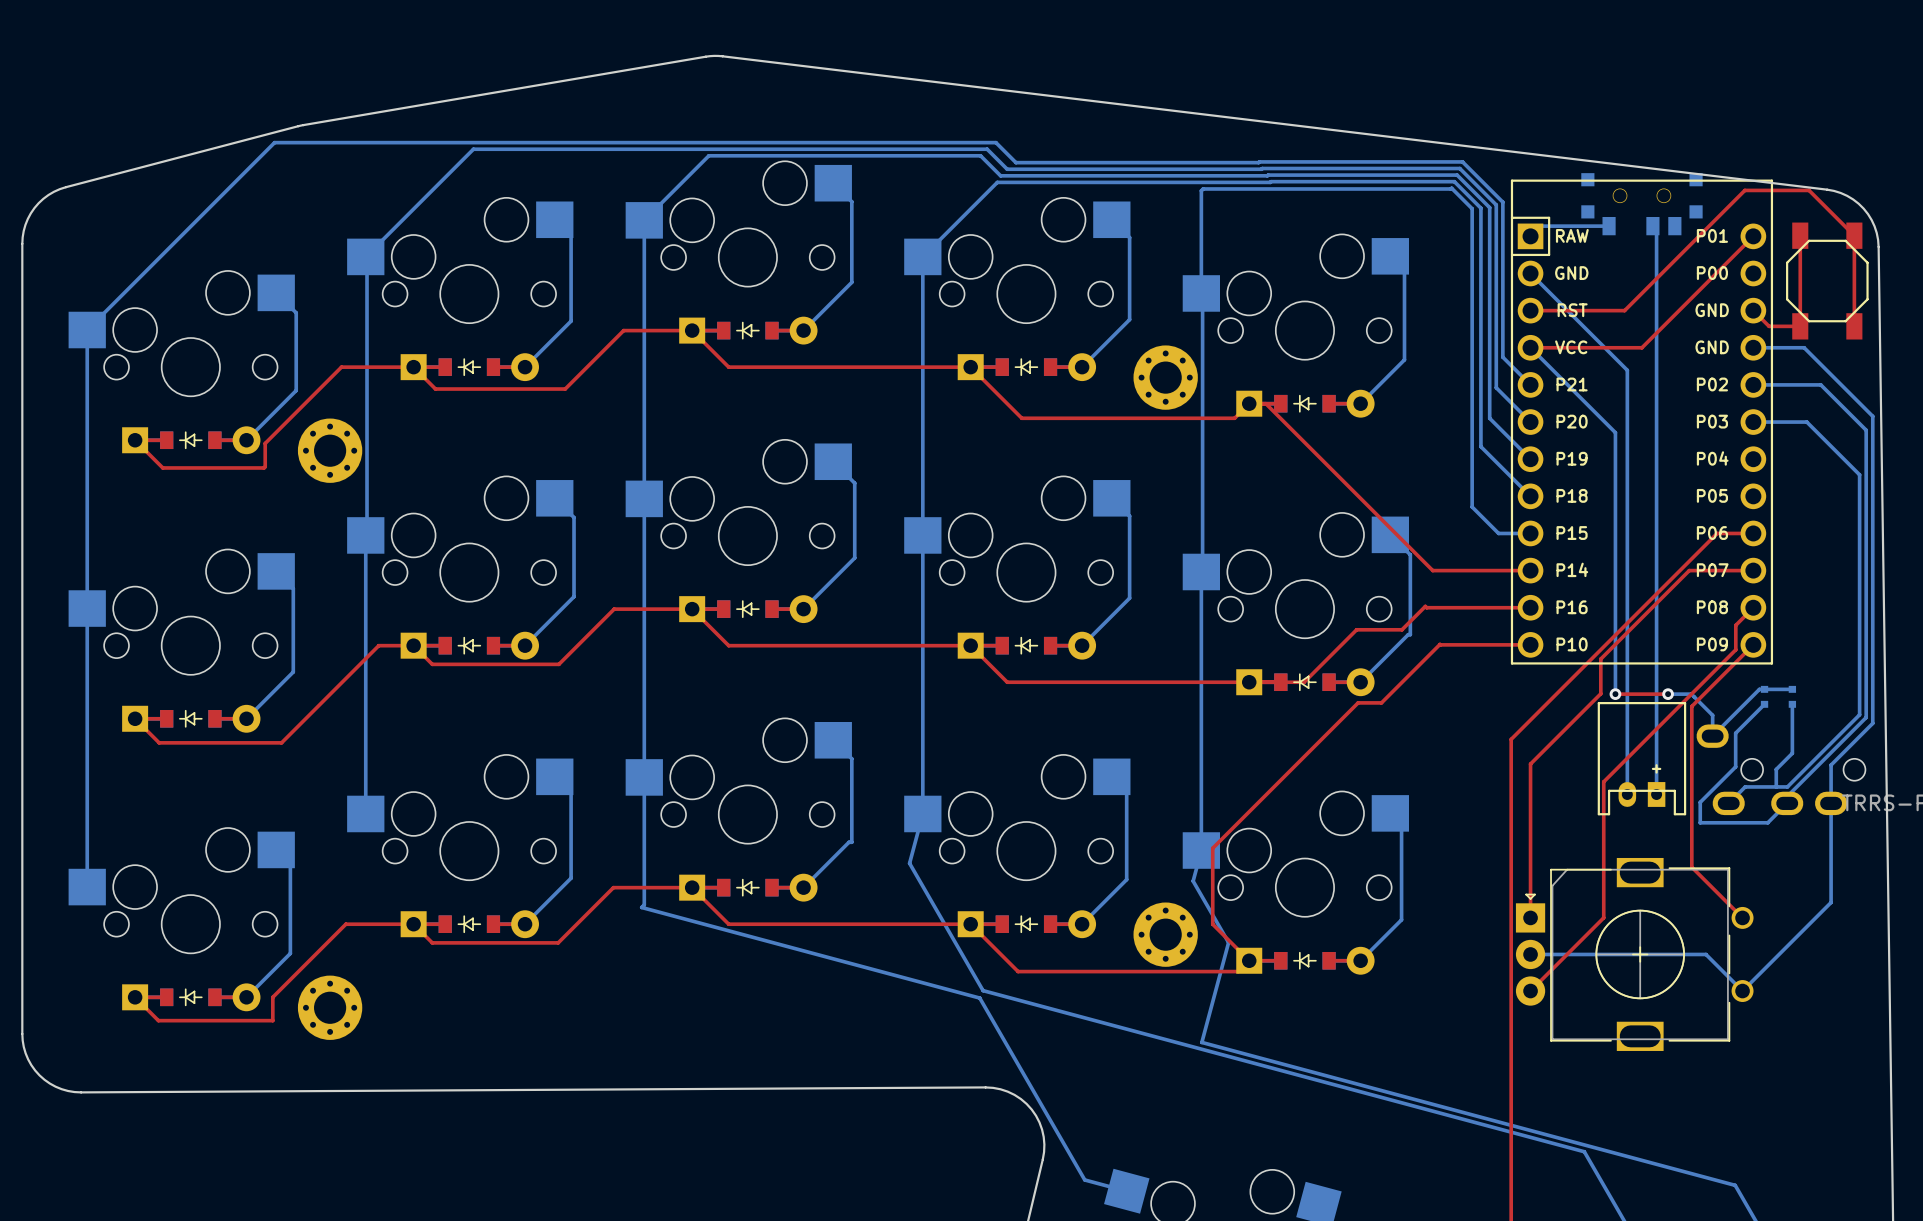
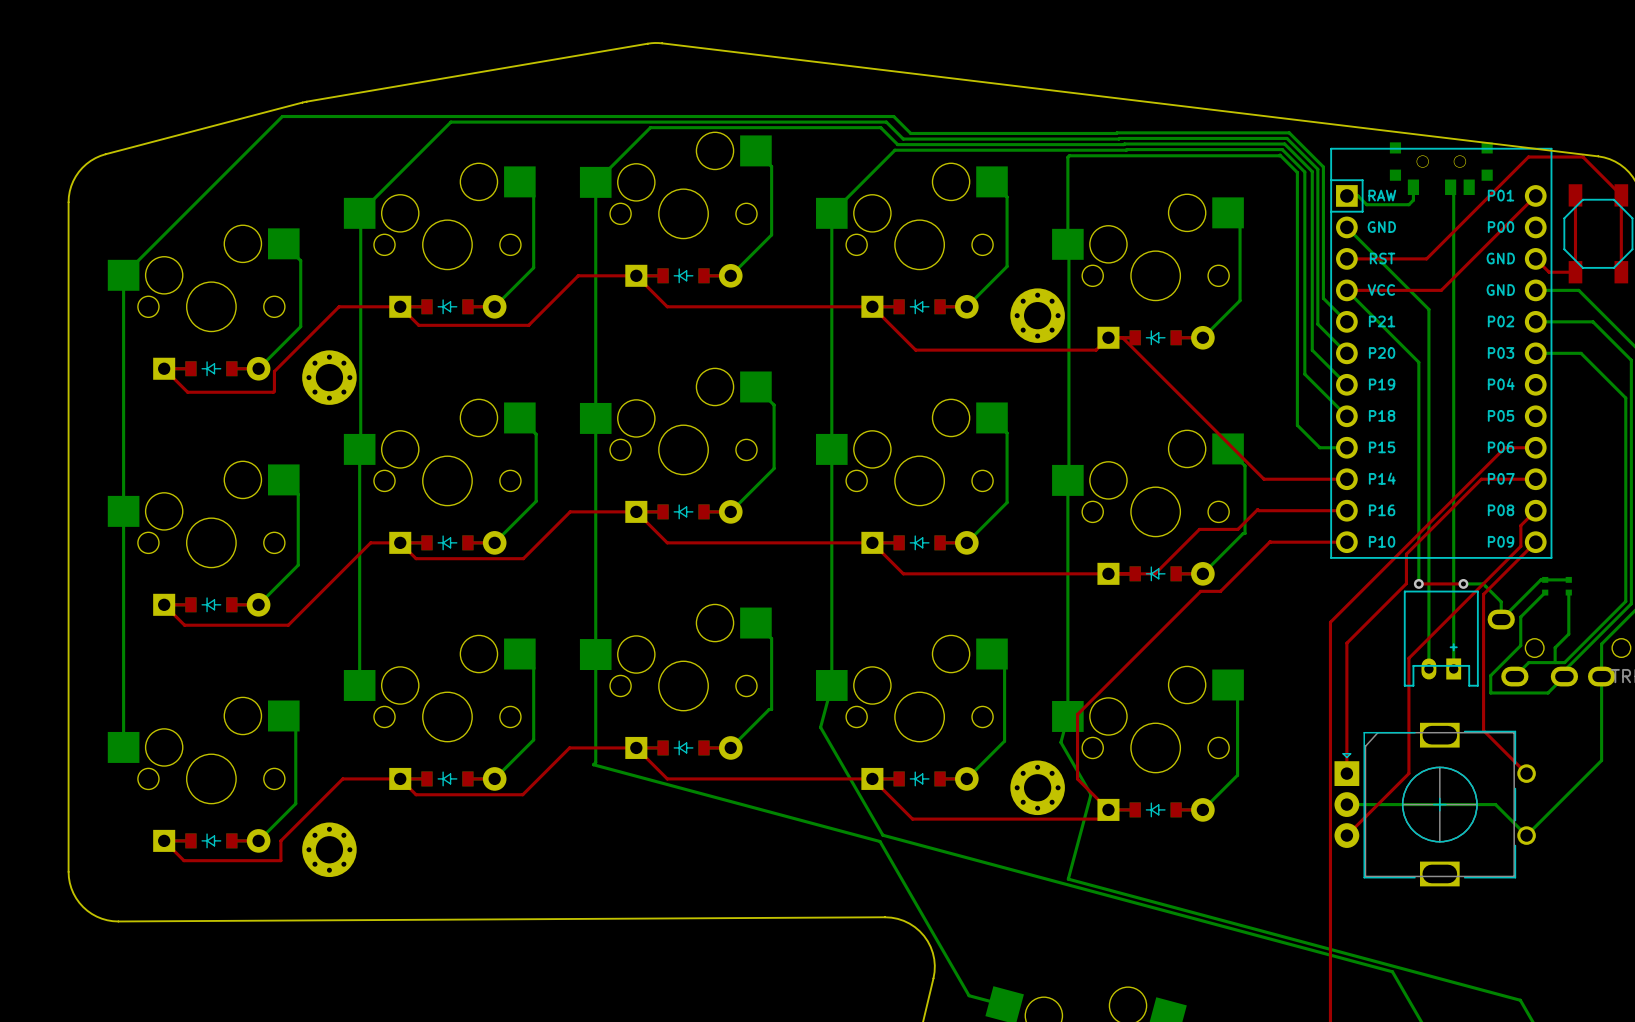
bottom track: (1540, 226) (1609, 226) -> none
bottom track: none -> (1413, 190) (1413, 200) (1408, 204) (1366, 204) (1358, 195) (1346, 195)

